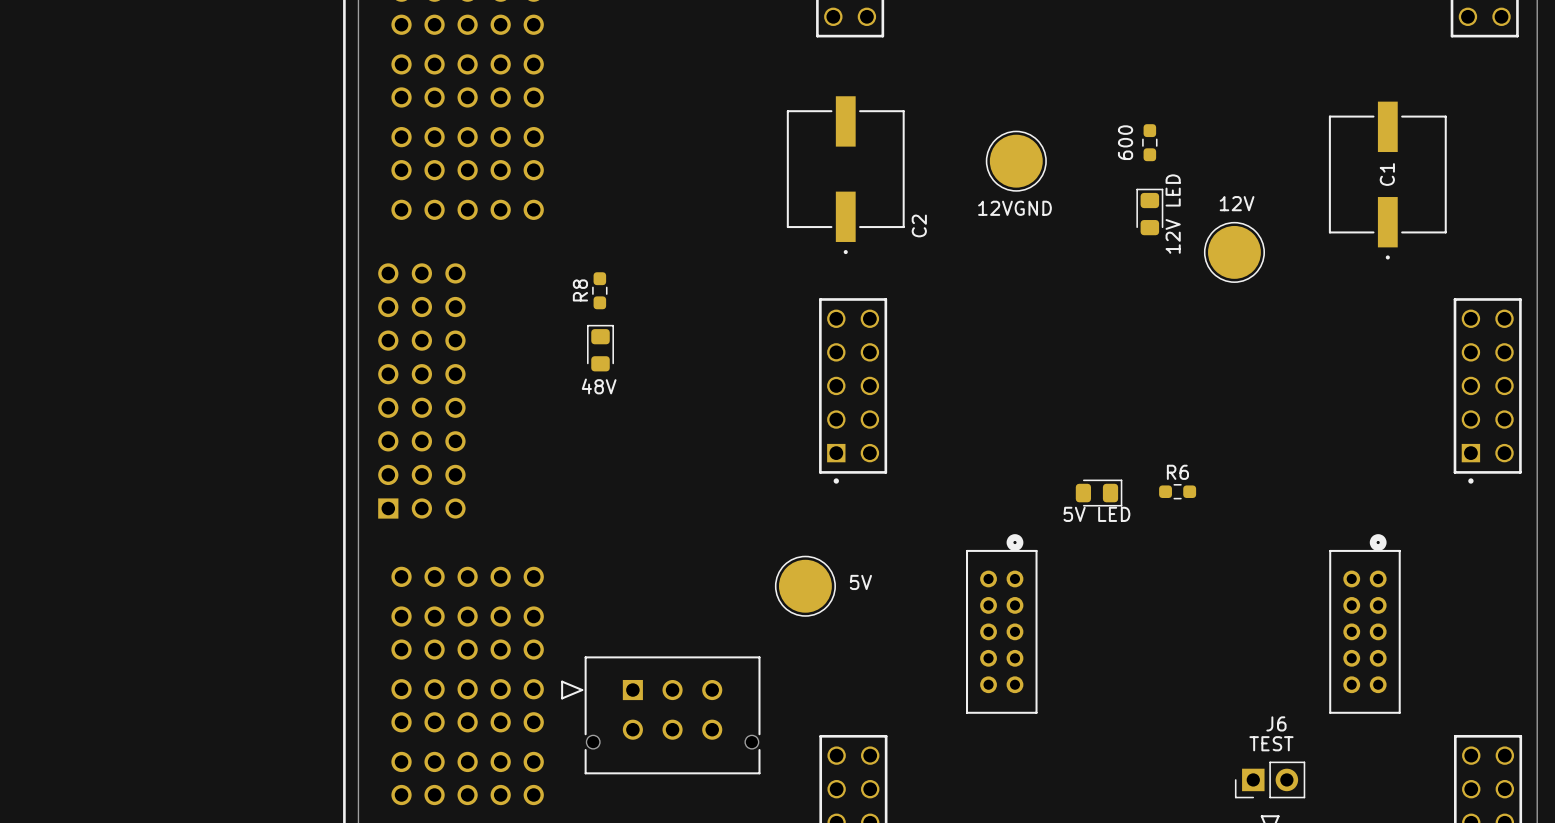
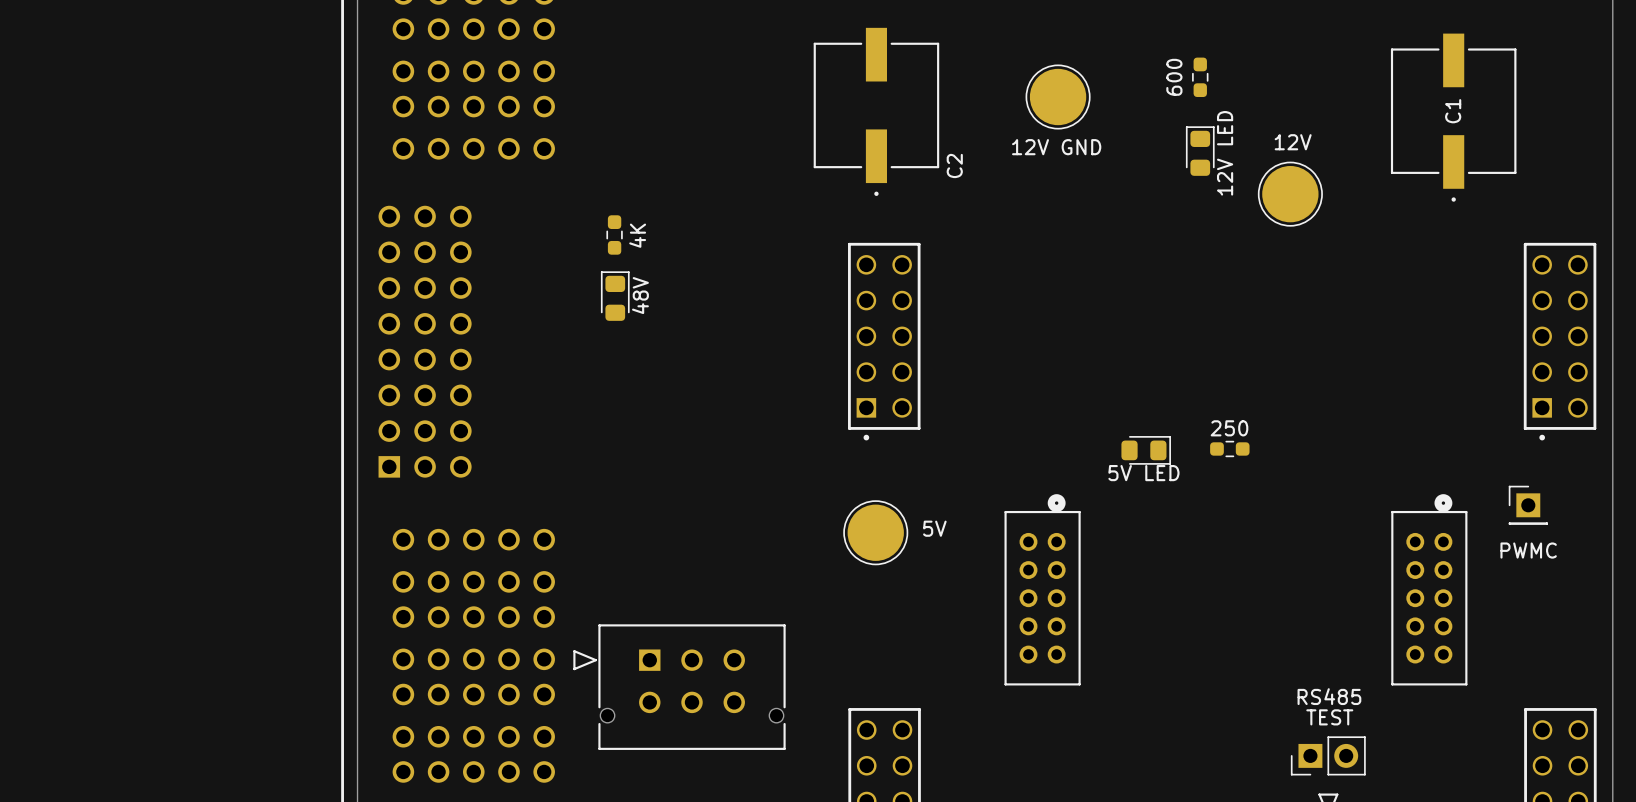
12VGND name: 12VGND (1014, 208) -> 12V GND (1056, 147)
R8 name: R8 (580, 290) -> 4K (637, 235)
48V name rotation: 0° (599, 386) -> 90° counterclockwise (640, 295)
48V name position: 48V (599, 386) -> 48V (640, 295)
R6 name: R6 (1177, 472) -> 250 (1229, 428)
PWMC: none -> (1528, 505)
5V position: (805, 586) -> (875, 532)
J6 name: J6 (1276, 723) -> RS485 (1329, 696)

